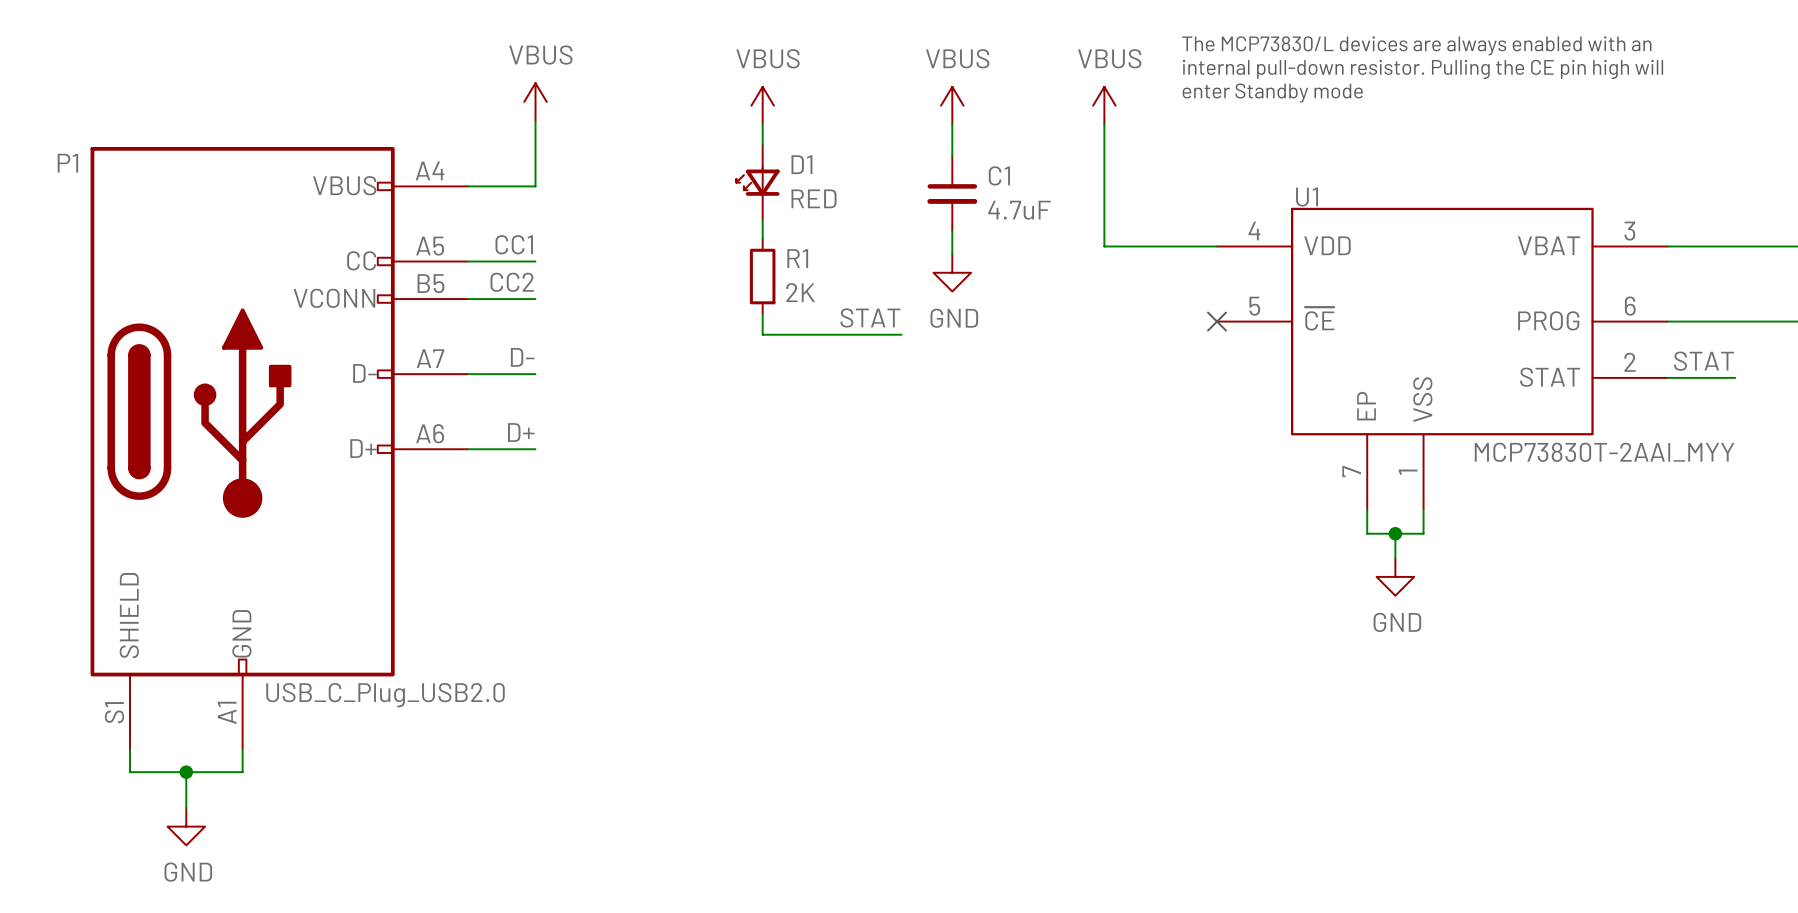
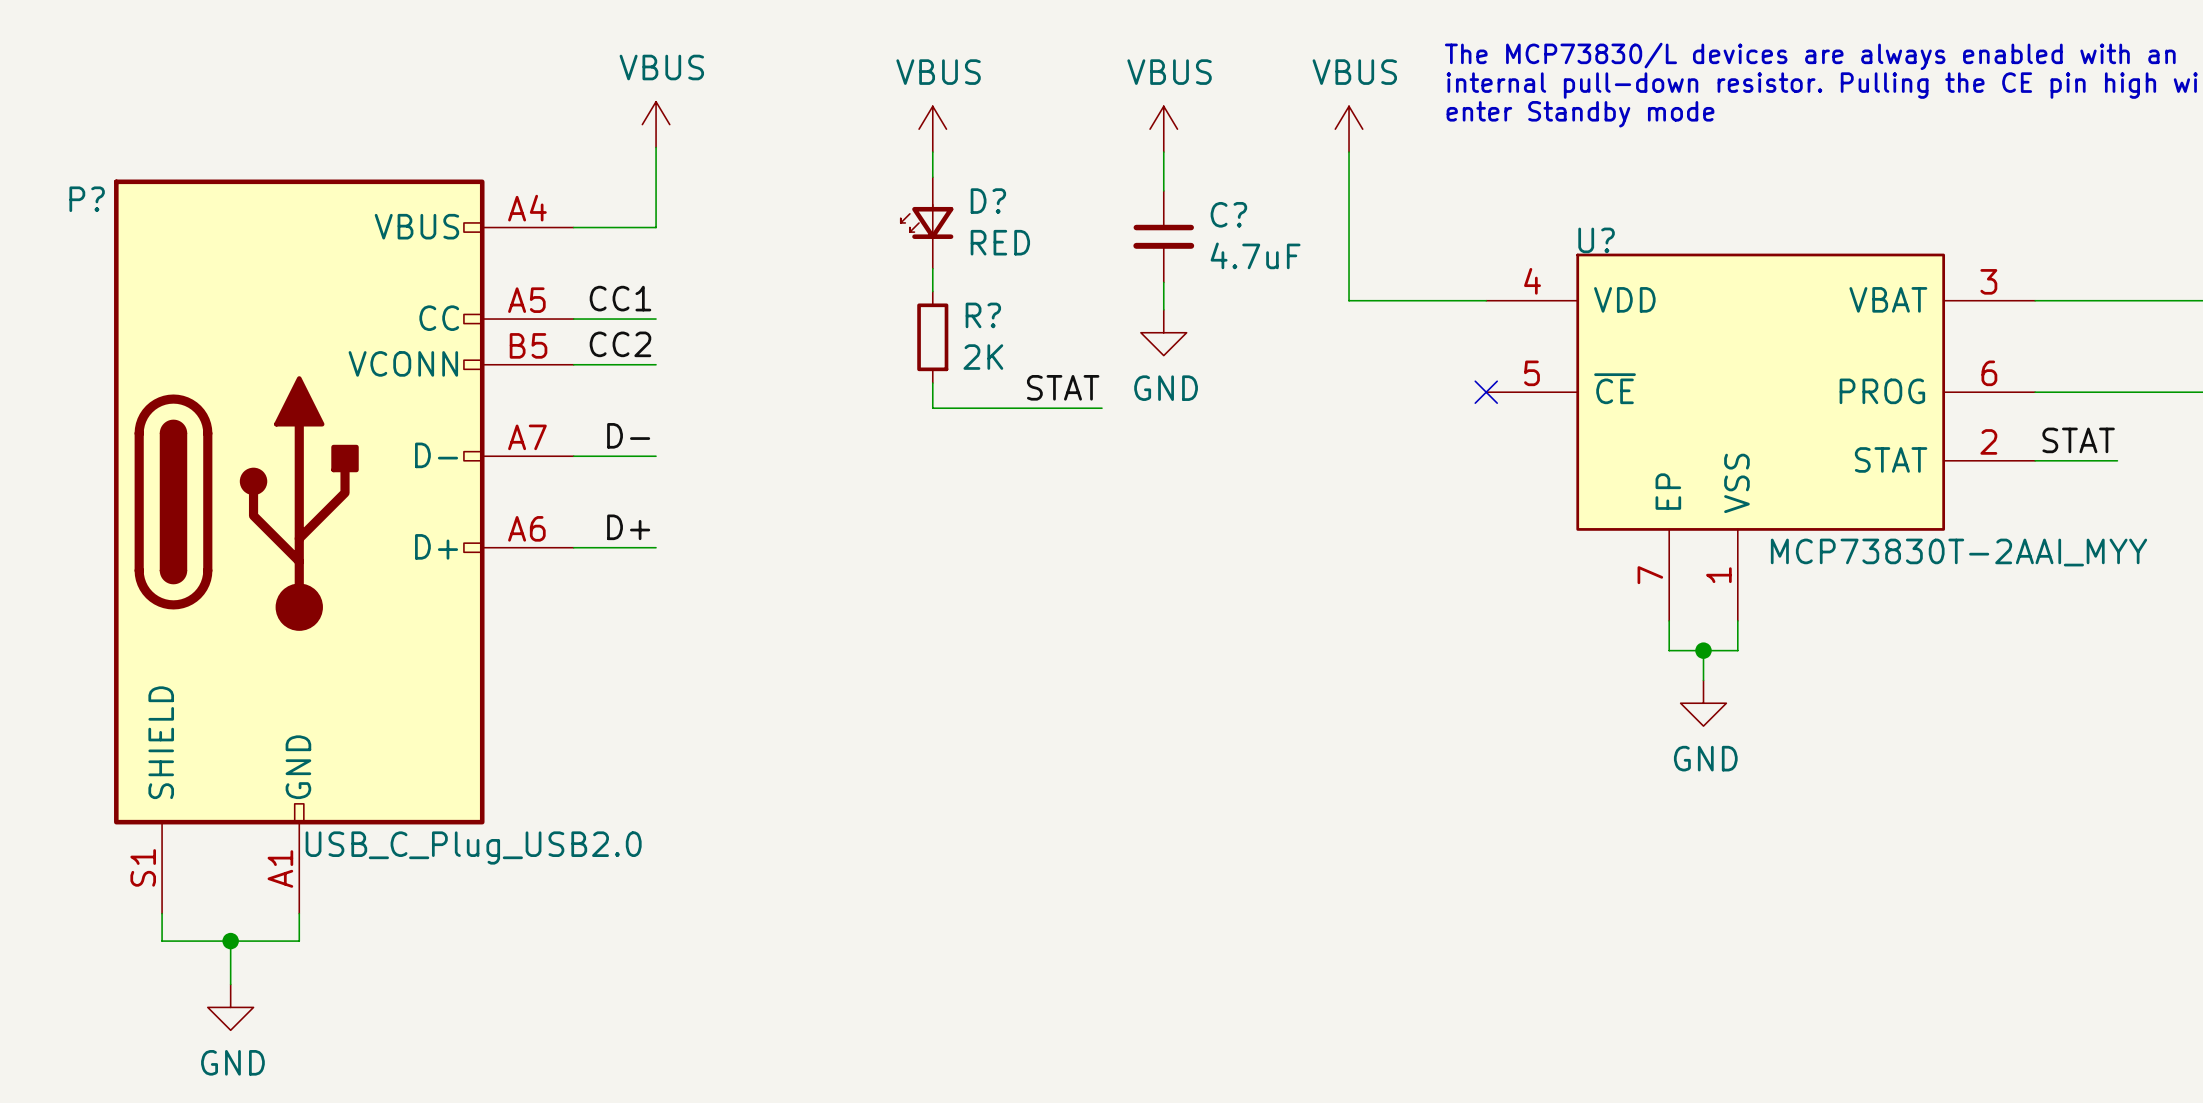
P1 name: P1 (67, 163) -> P? (87, 199)
D1 name: D1 (801, 164) -> D? (988, 201)
C1 name: C1 (999, 175) -> C? (1228, 214)
U1 name: U1 (1307, 197) -> U? (1596, 240)
R1 name: R1 (797, 258) -> R? (983, 315)

